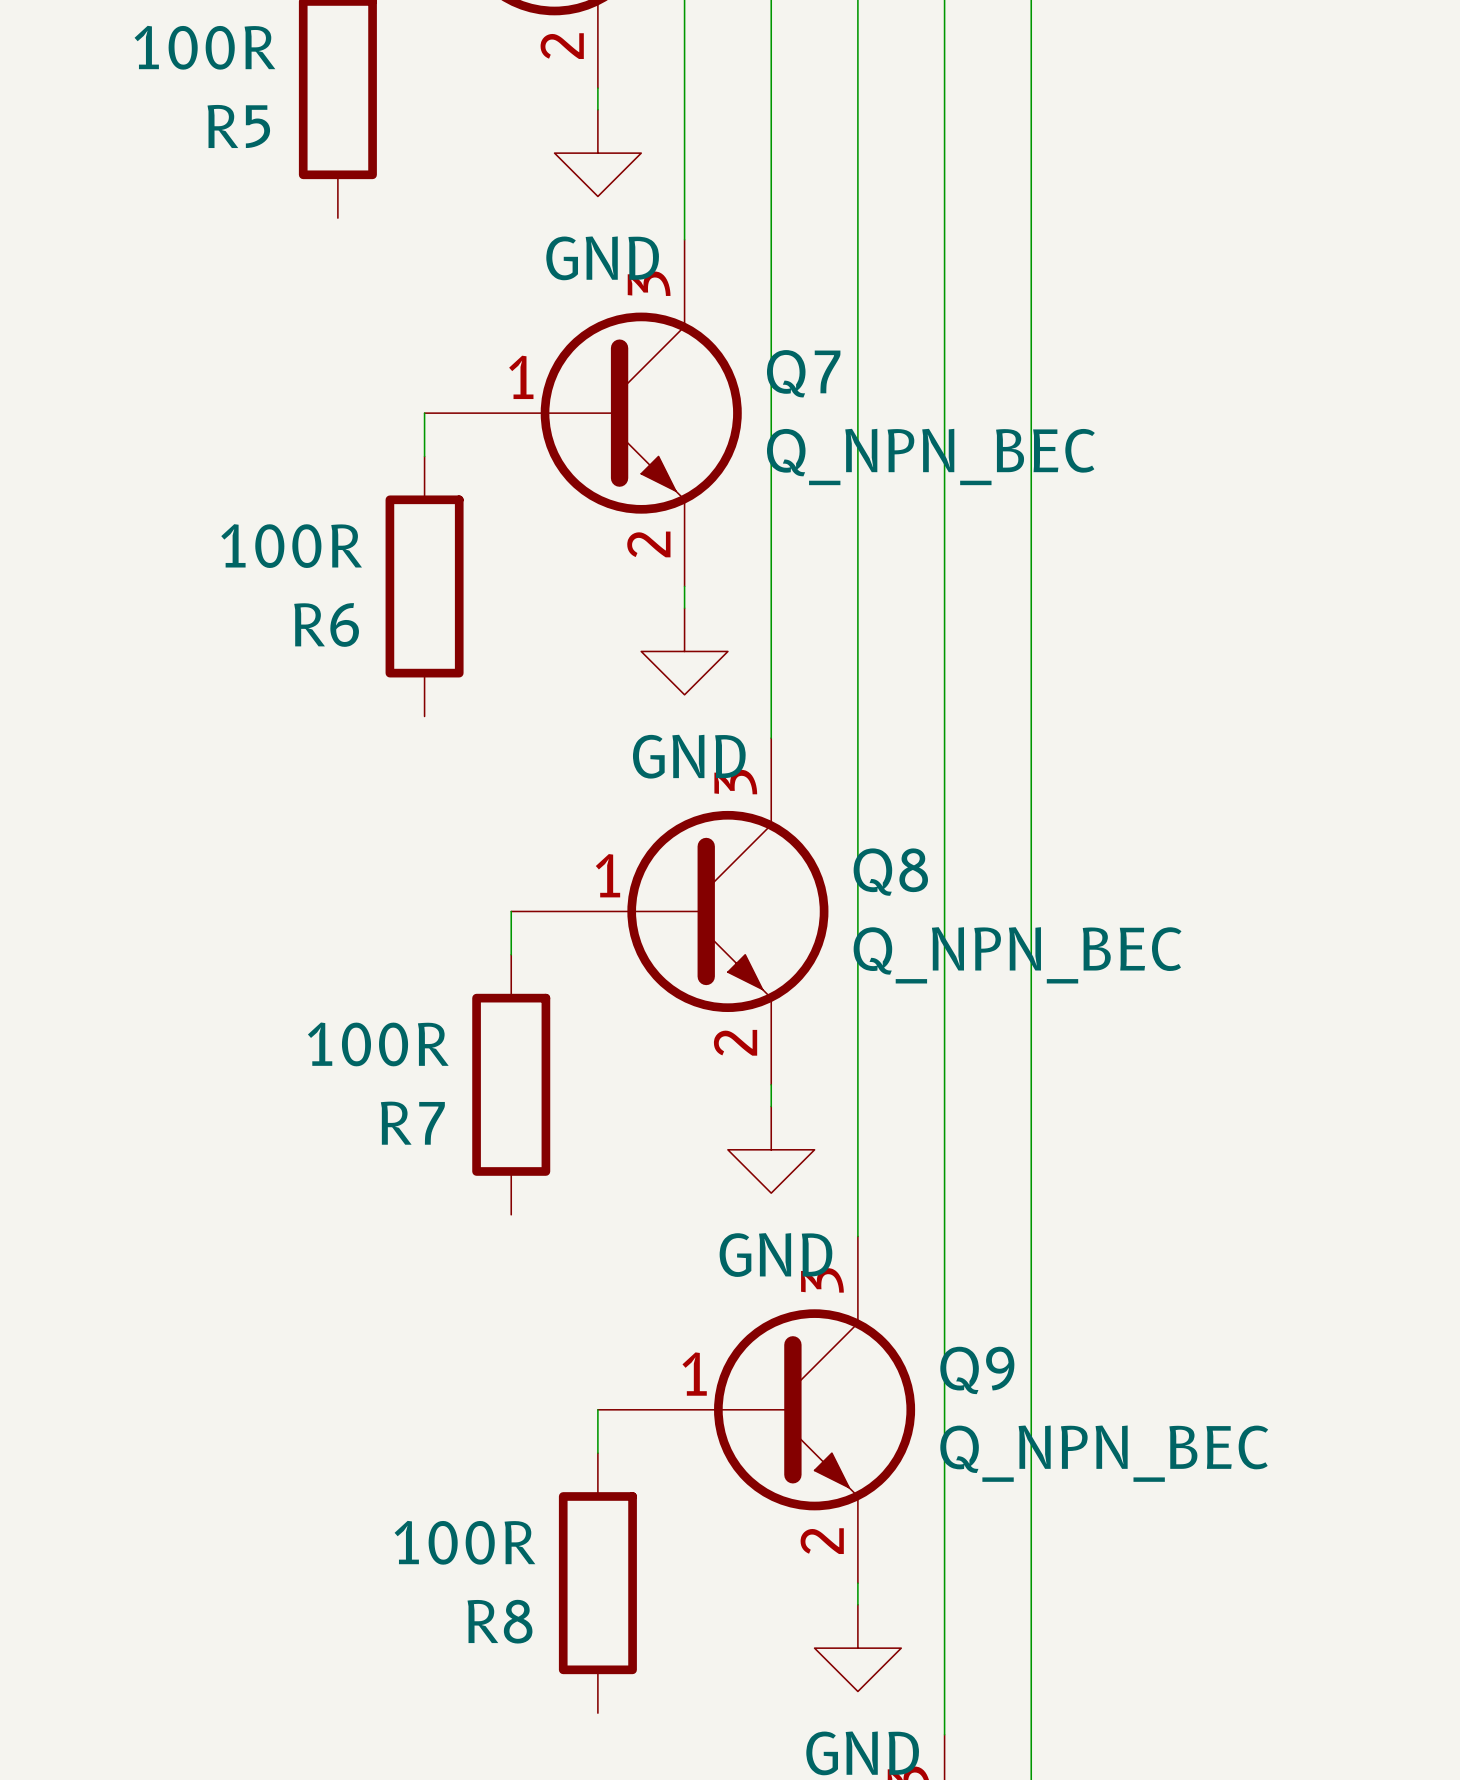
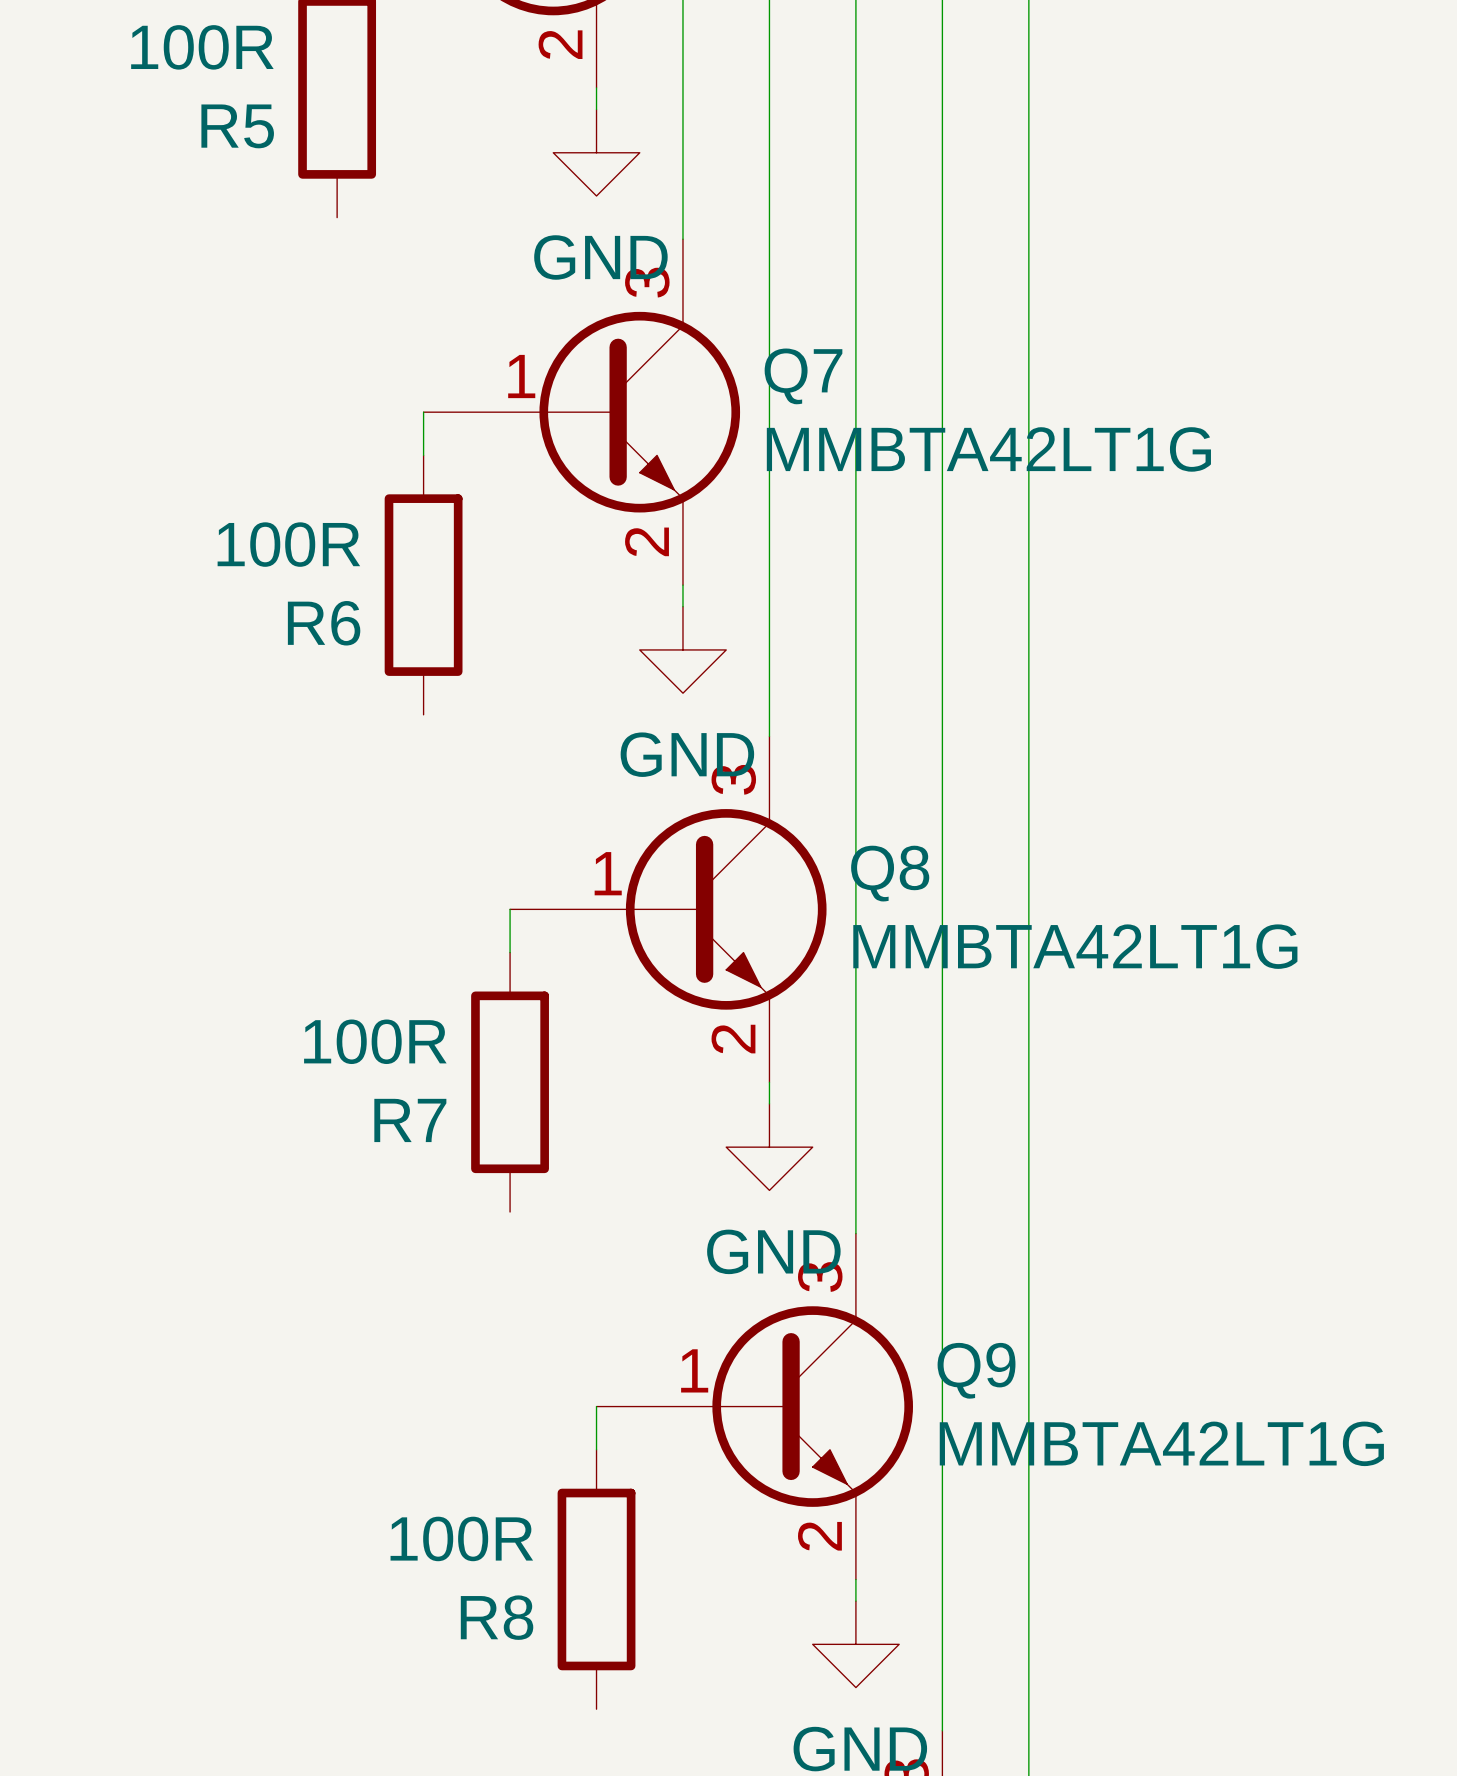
Q7 value: Q_NPN_BEC (930, 456) -> MMBTA42LT1G (988, 449)
Q8 value: Q_NPN_BEC (1017, 955) -> MMBTA42LT1G (1075, 946)
Q9 value: Q_NPN_BEC (1104, 1453) -> MMBTA42LT1G (1161, 1443)

